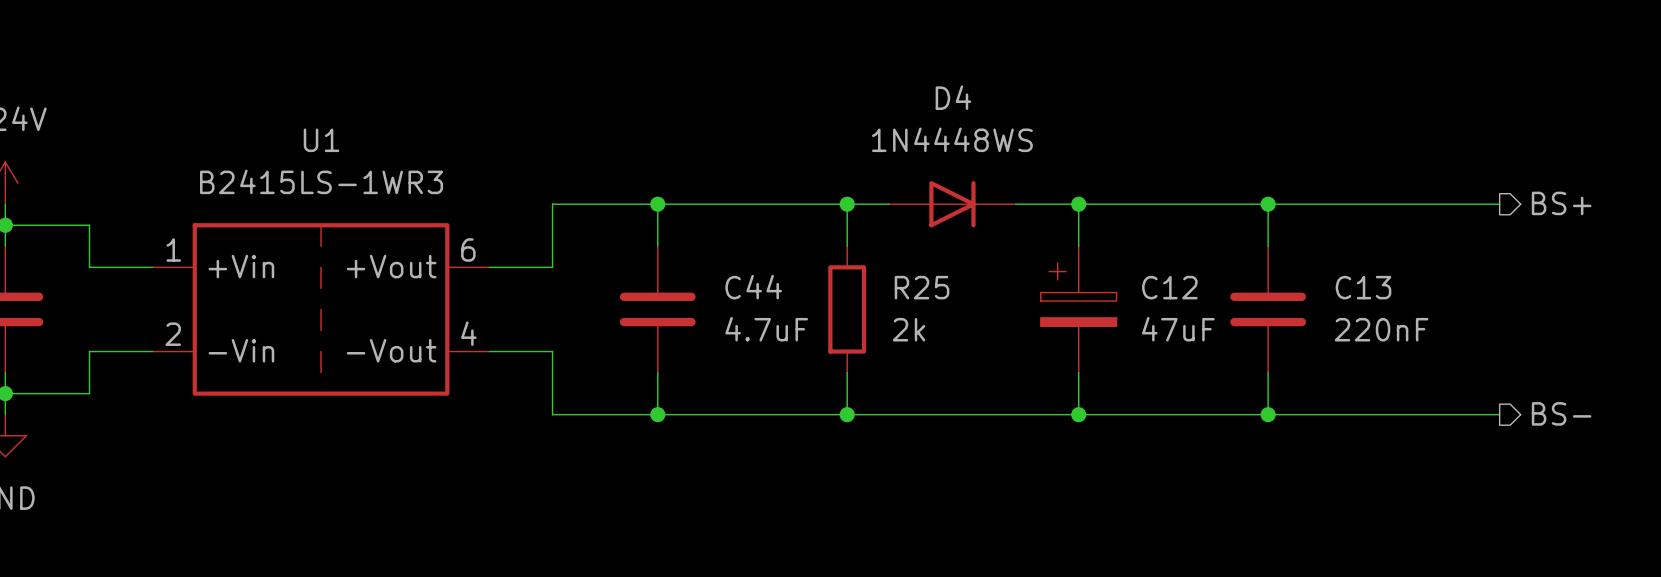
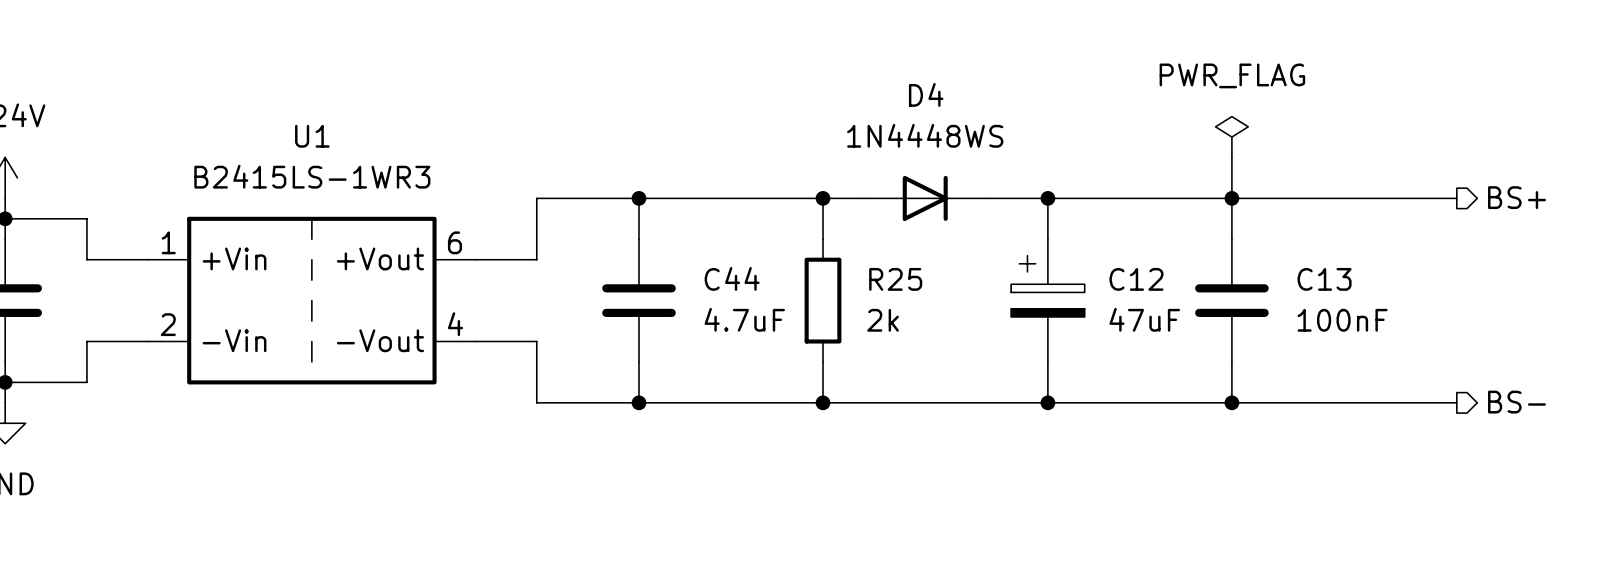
power symbol: none -> PWR_FLAG (1231, 137)
wire: none -> (1231, 157) (1231, 198)
C13 value: 220nF (1381, 329) -> 100nF (1342, 320)

